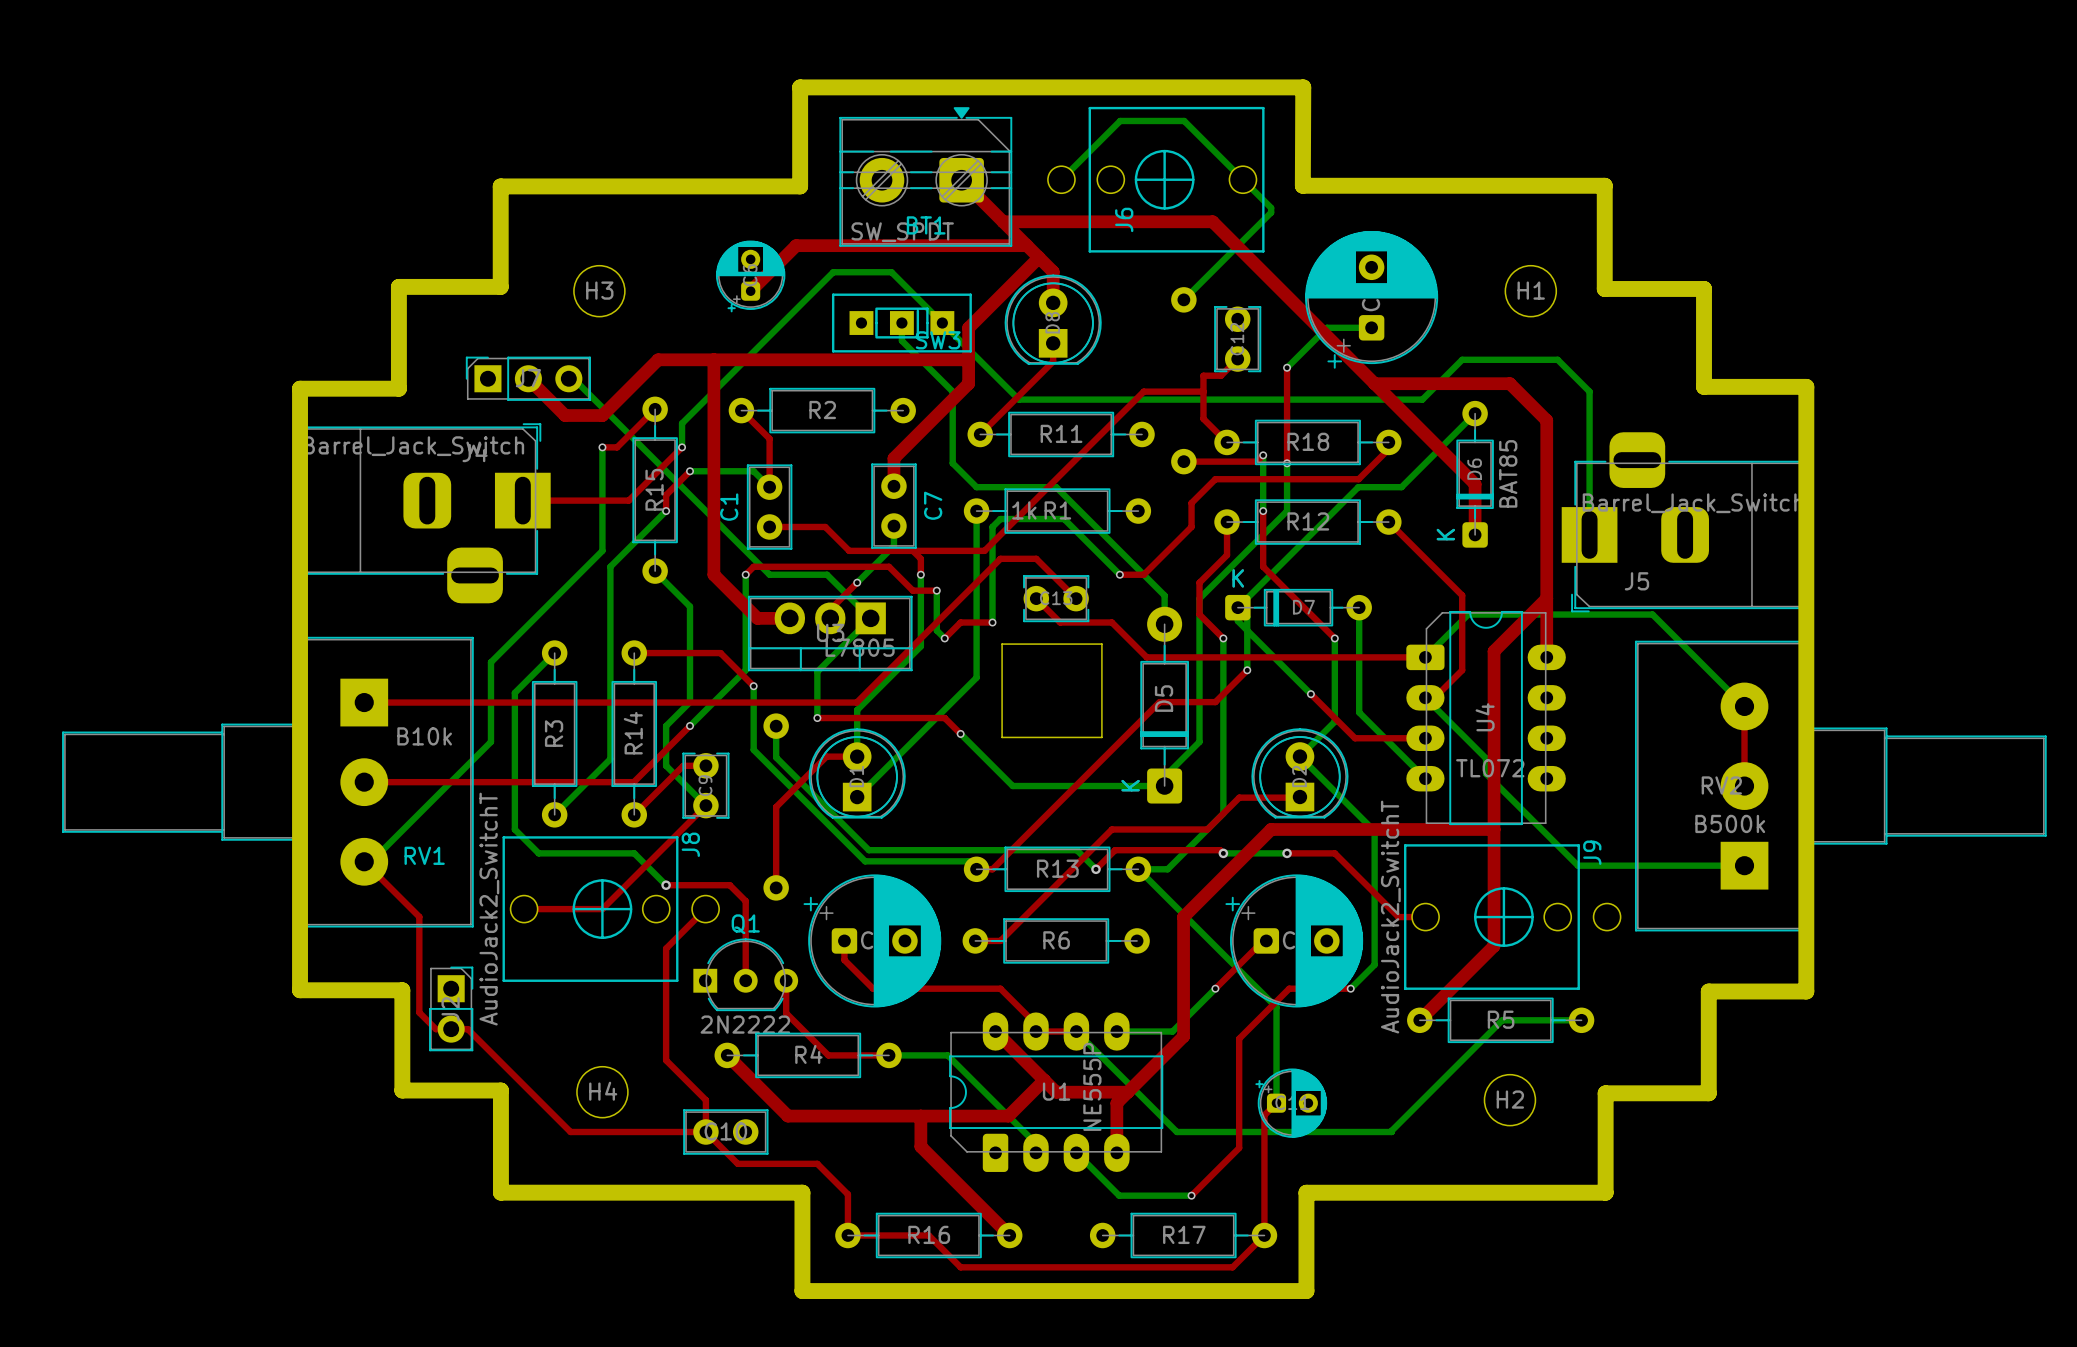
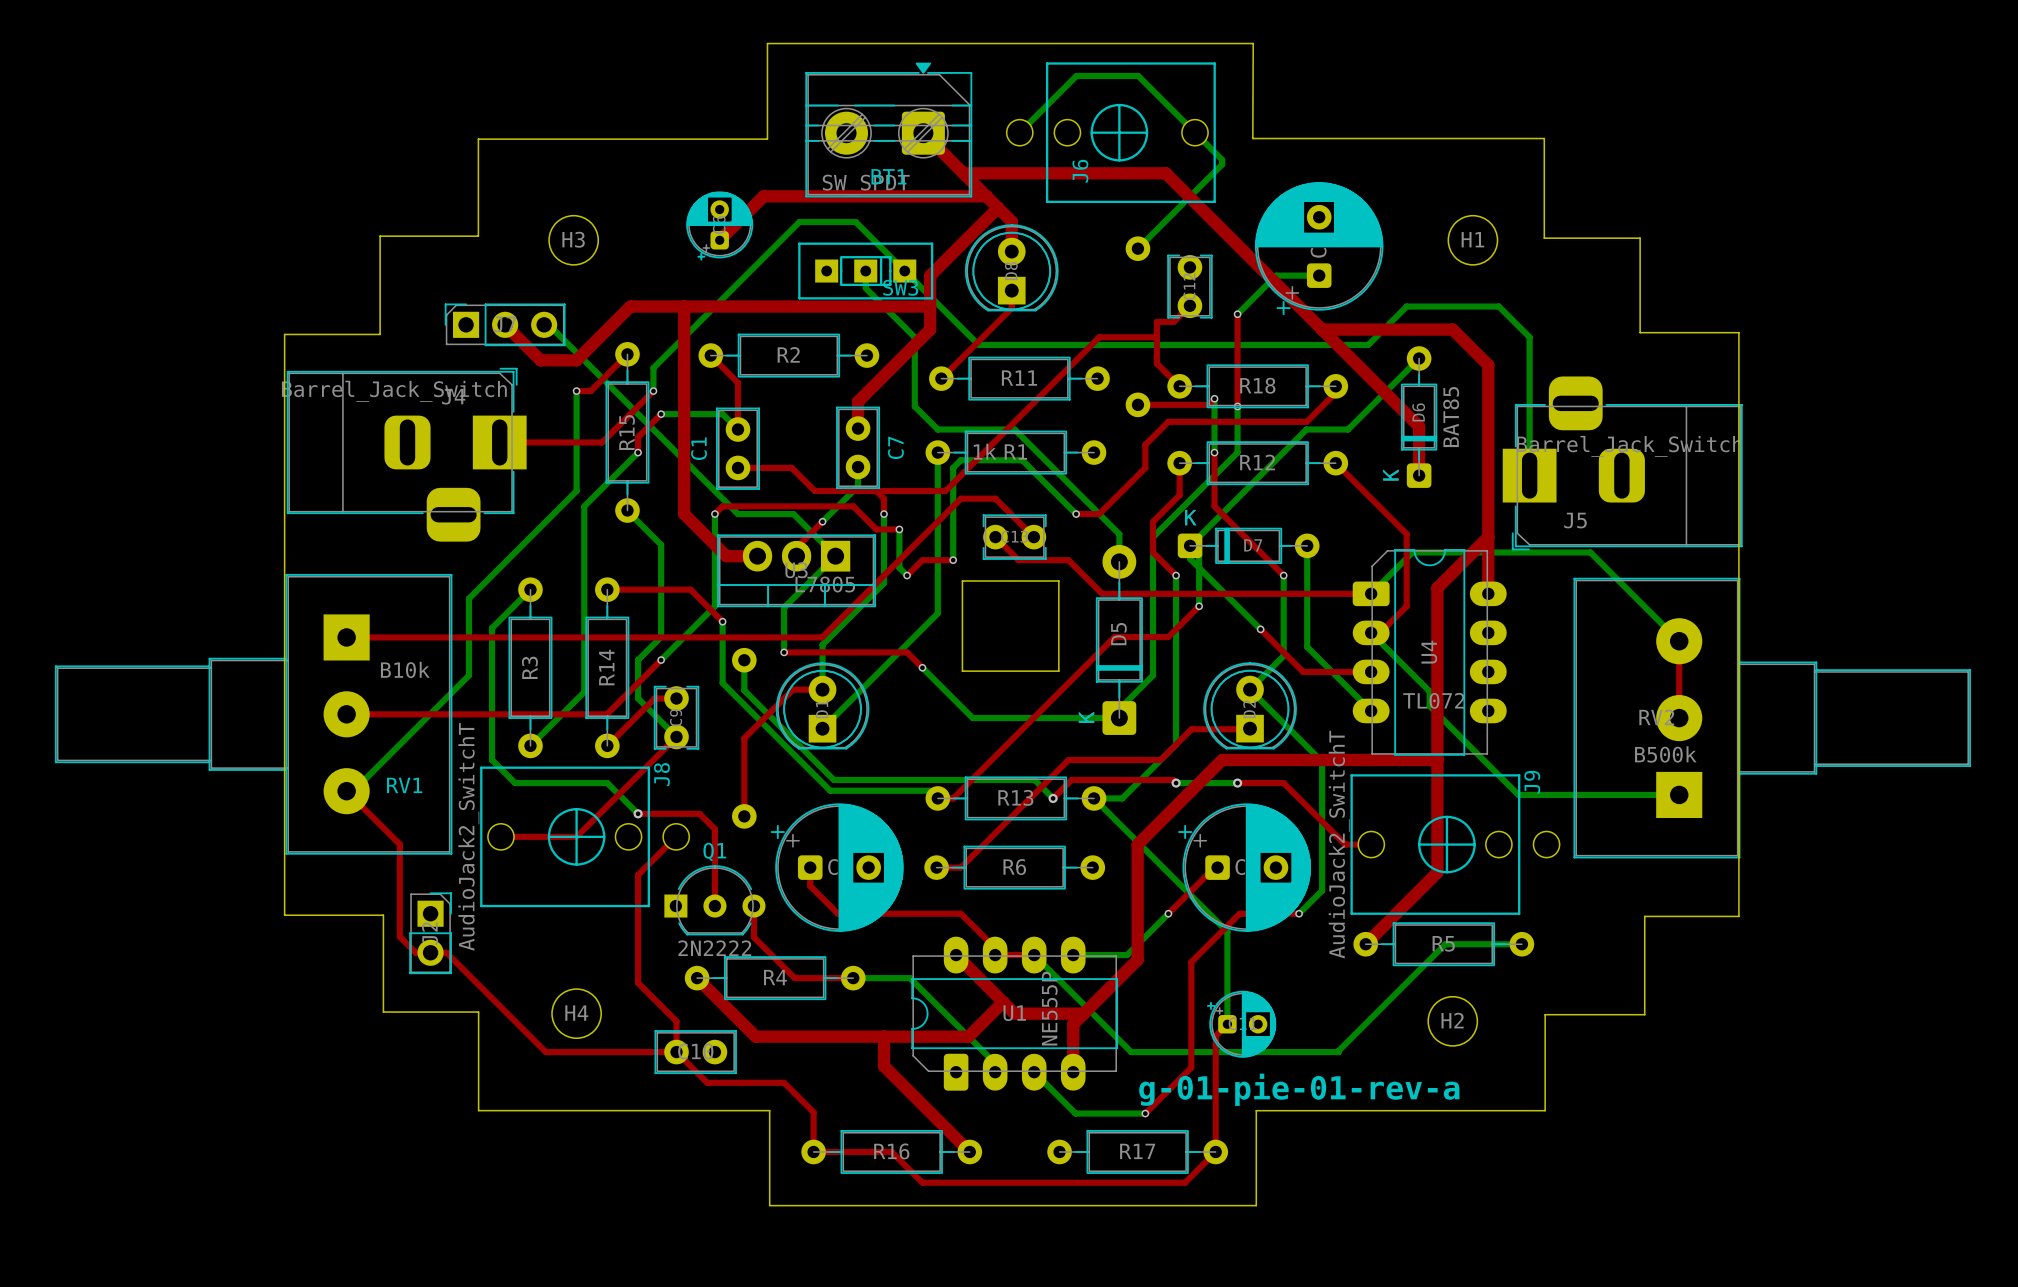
board edge width: thick (800, 87) (800, 186) (500, 186) (500, 286) (398, 286) (398, 388) (300, 388) (300, 990) (402, 990) (402, 1090) (500, 1090) (500, 1192) (802, 1192) (802, 1291) (1306, 1291) (1306, 1192) (1605, 1192) (1605, 1093) (1708, 1093) (1708, 991) (1806, 991) (1806, 386) (1704, 386) (1704, 288) (1604, 288) (1604, 185) (1302, 185) (1303, 87) (800, 87) -> thin (767, 43) (767, 139) (478, 139) (478, 236) (380, 236) (380, 334) (284, 334) (284, 915) (383, 915) (383, 1012) (478, 1012) (478, 1110) (769, 1110) (769, 1205) (1256, 1205) (1256, 1110) (1545, 1110) (1545, 1014) (1644, 1014) (1644, 916) (1738, 916) (1738, 332) (1640, 332) (1640, 238) (1544, 238) (1544, 138) (1252, 138) (1253, 43) (767, 43)
text: none -> g-01-pie-01-rev-a (1299, 1089)

